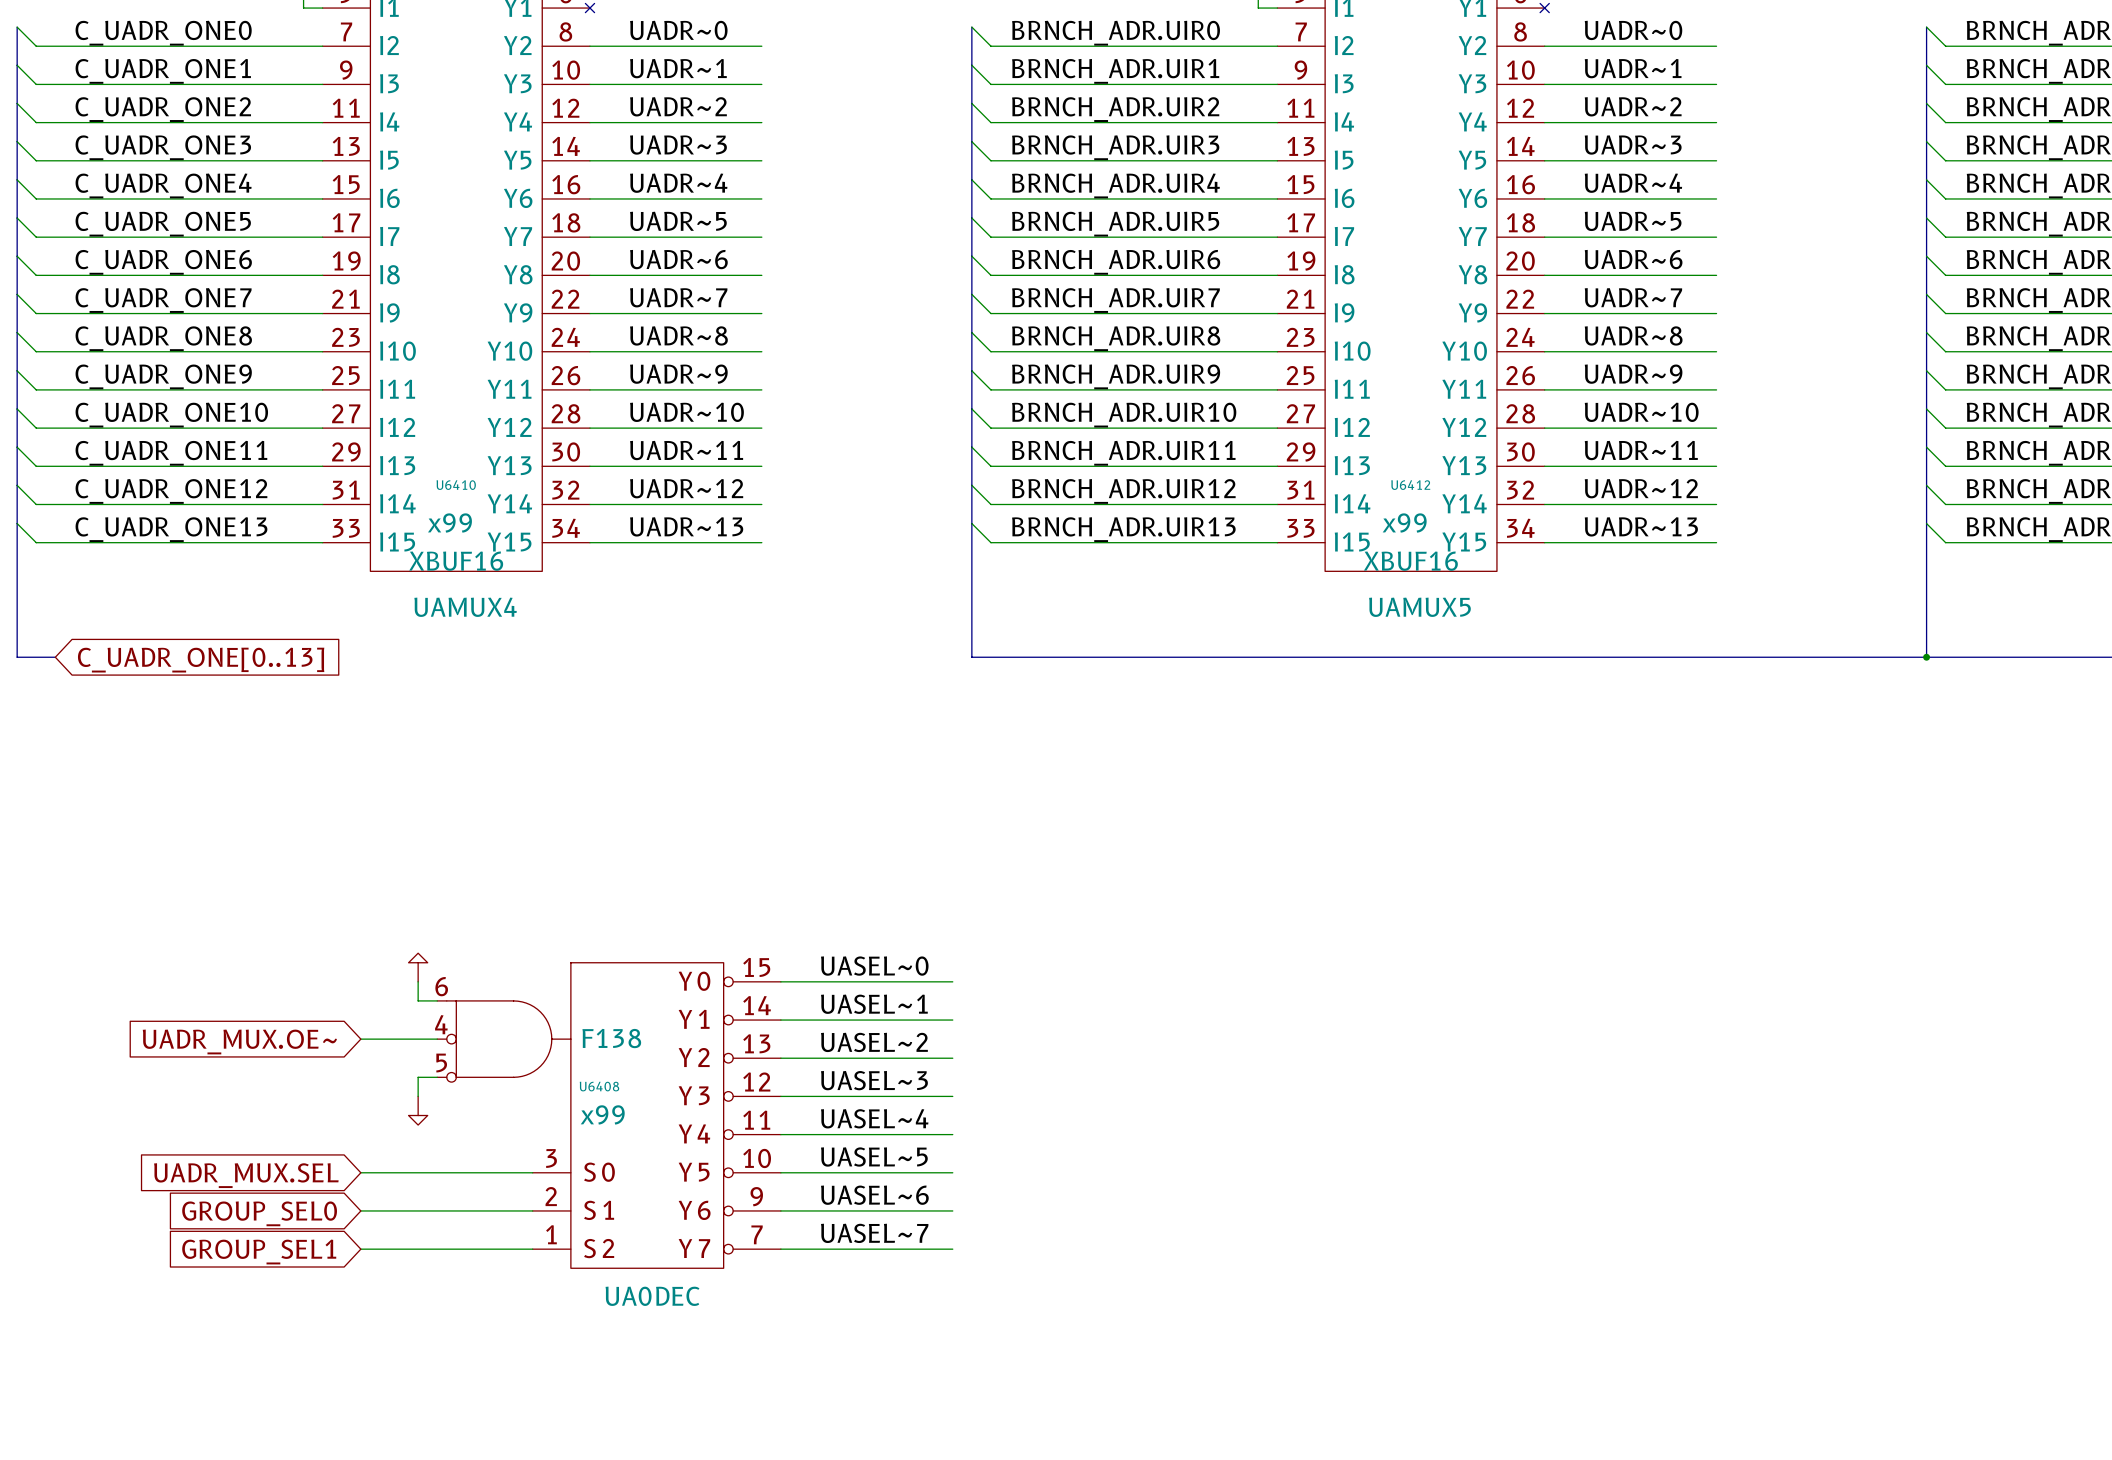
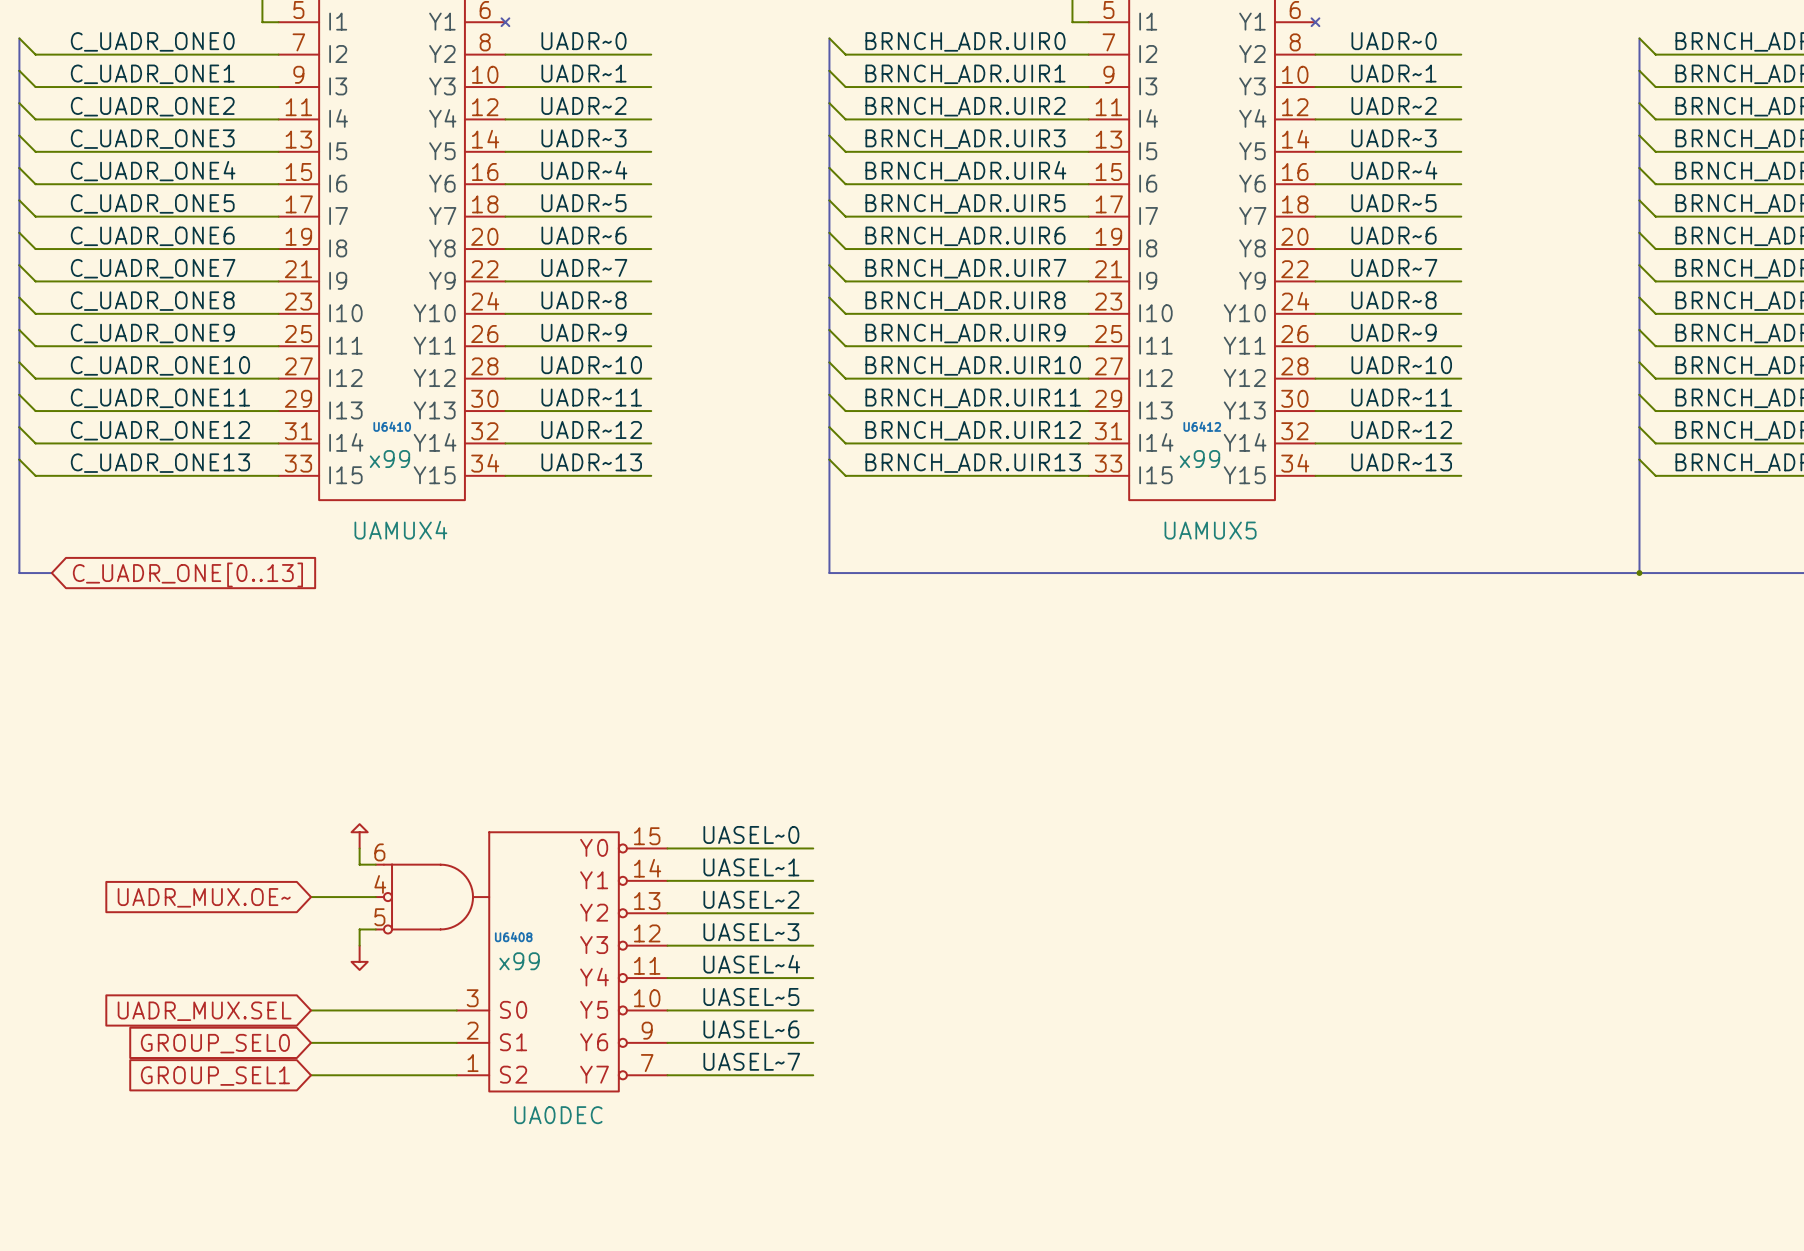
U6410 value: XBUF16 (456, 561) -> none
U6412 value: XBUF16 (1410, 561) -> none
U6408 value: F138 (611, 1038) -> none

